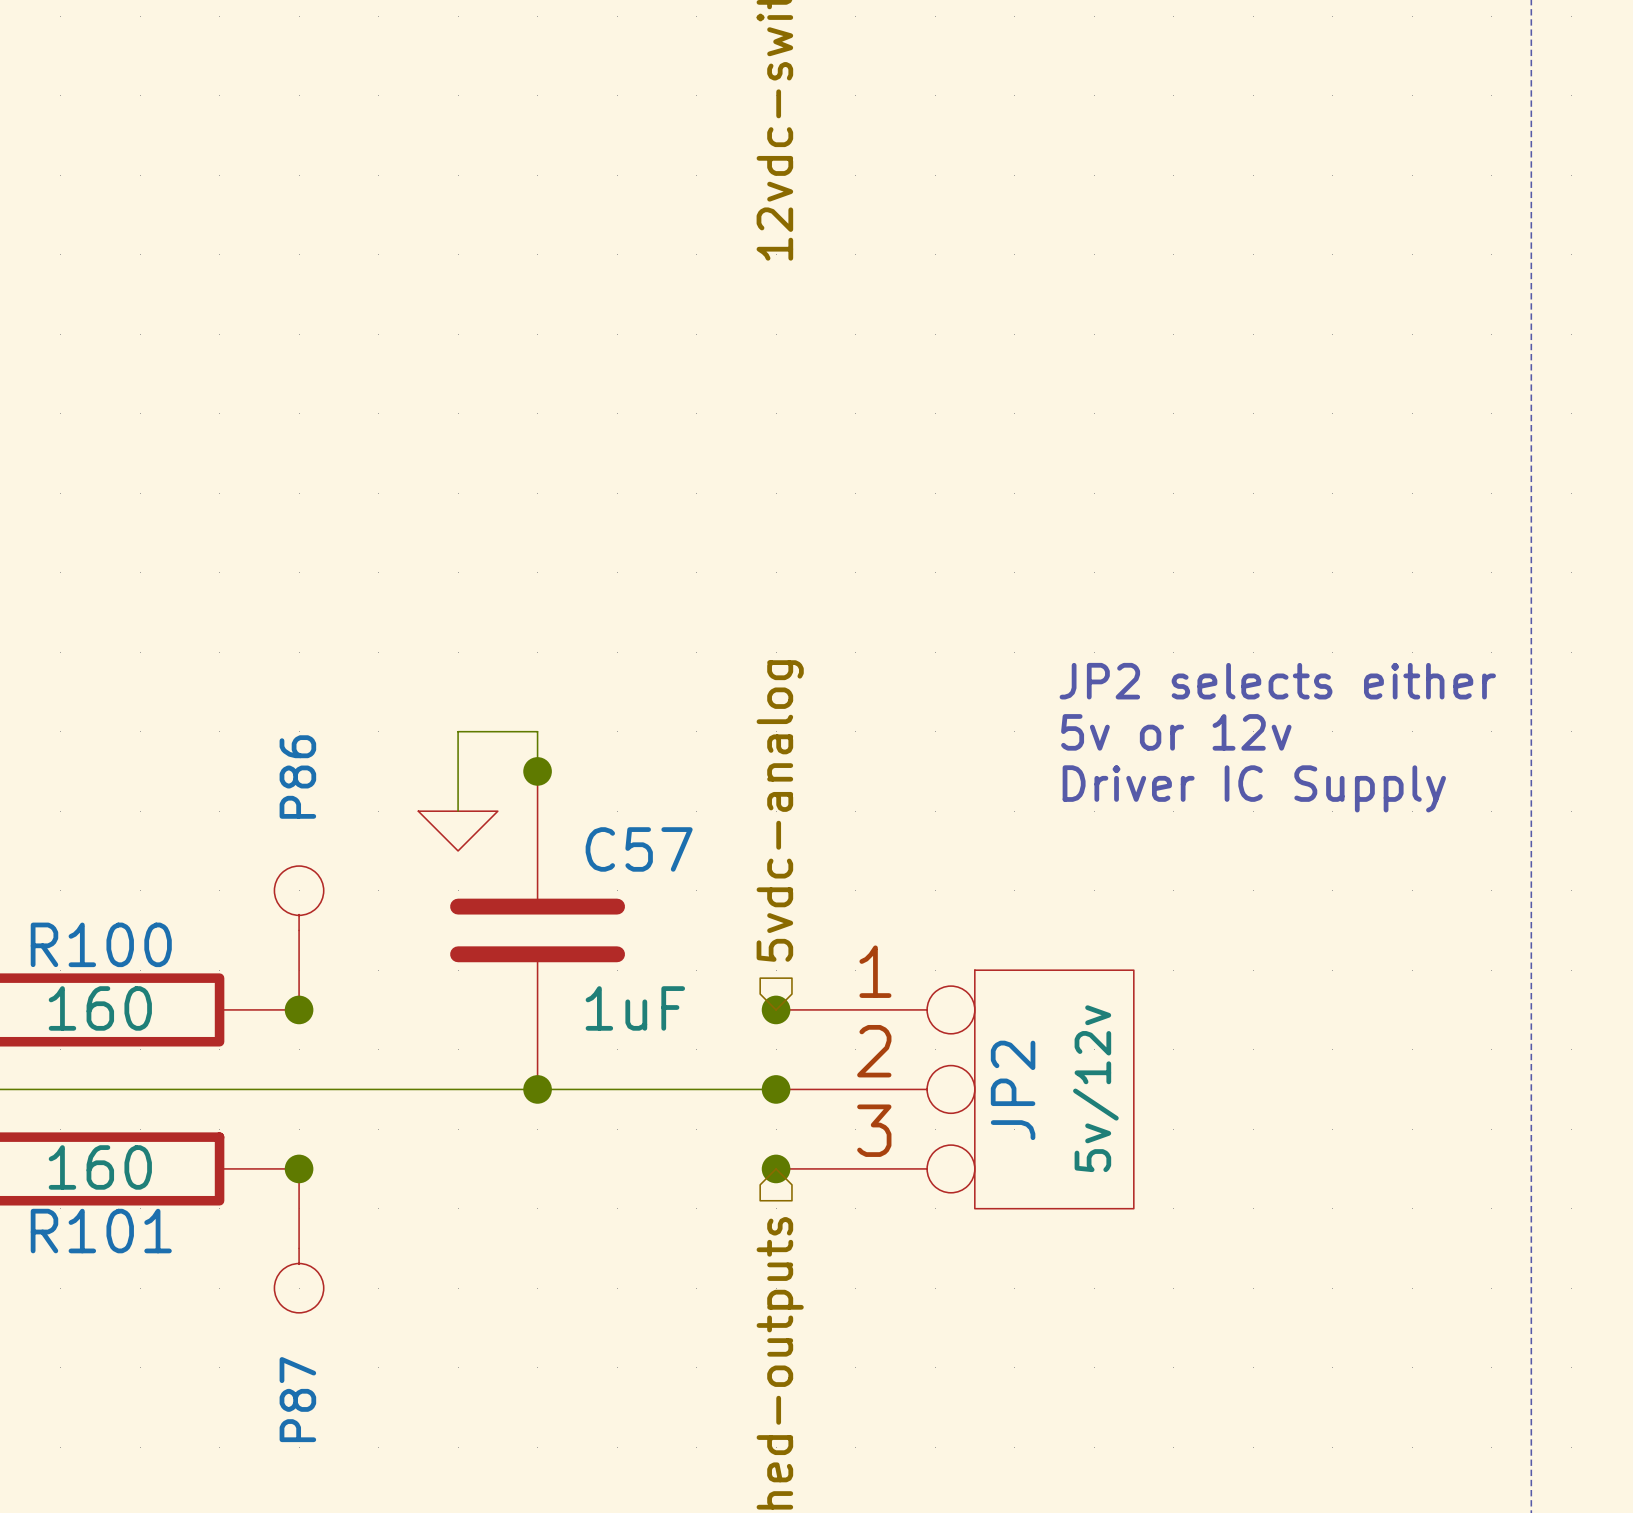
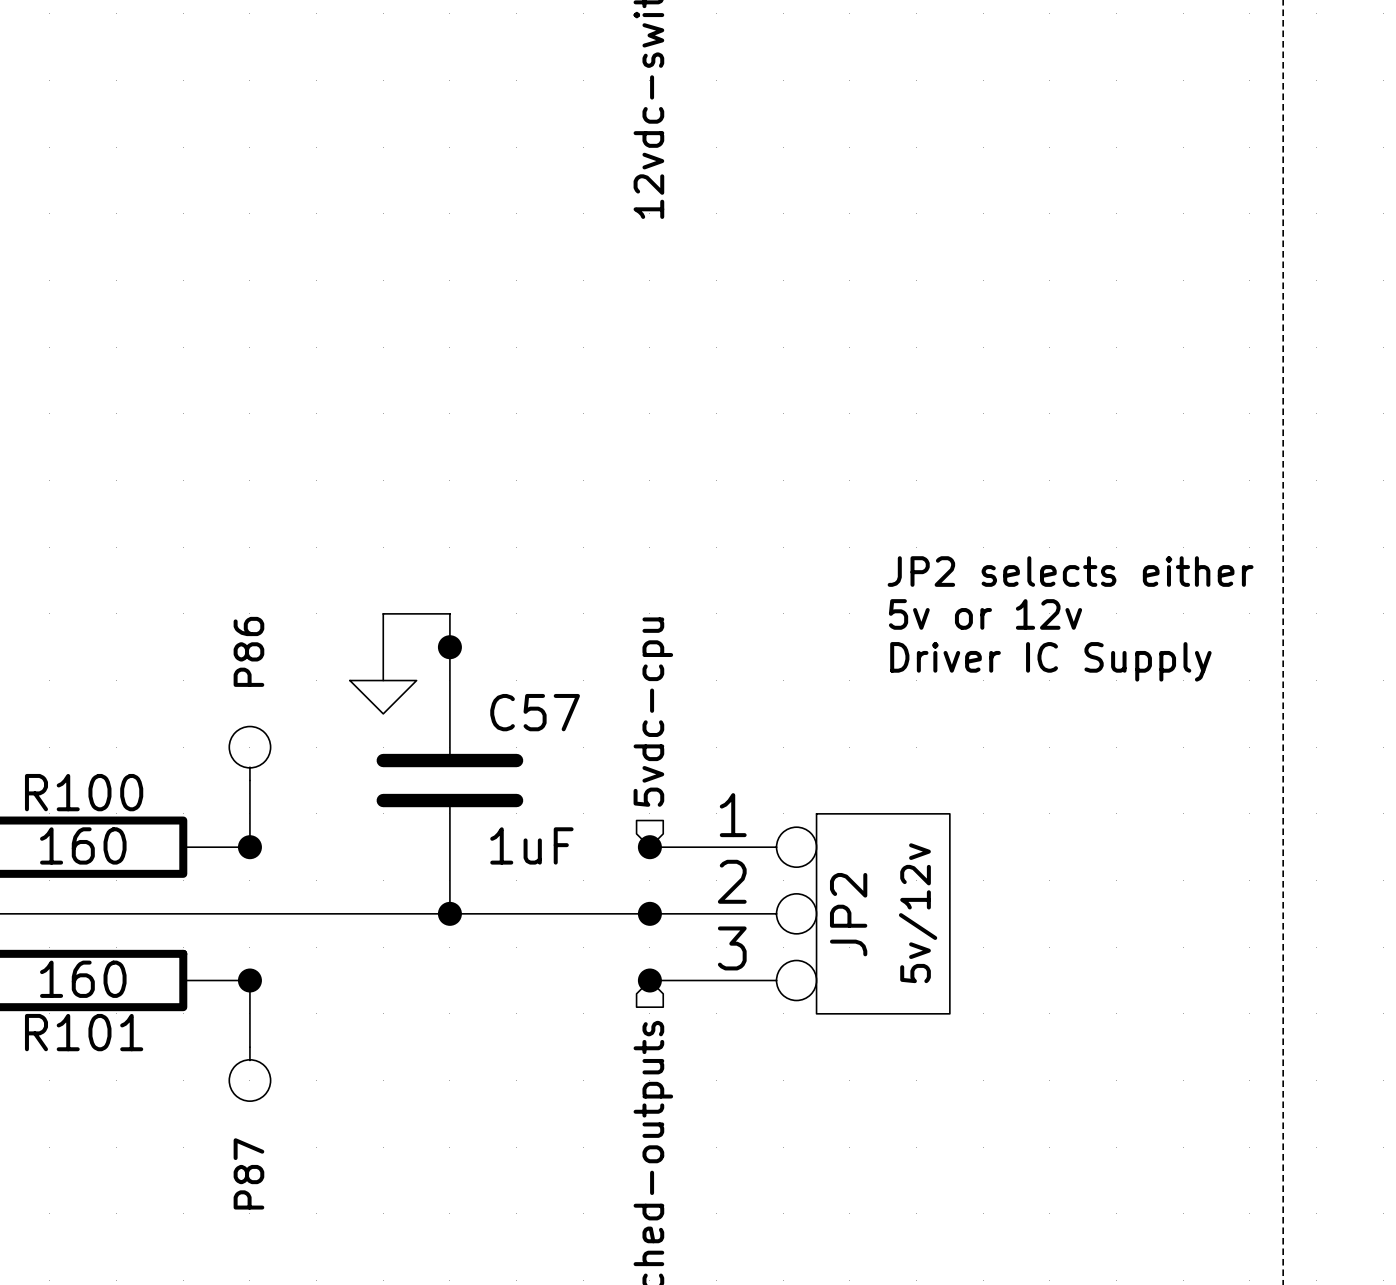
hierarchical label: 5vdc-analog (780, 811) -> 5vdc-cpu (653, 712)

